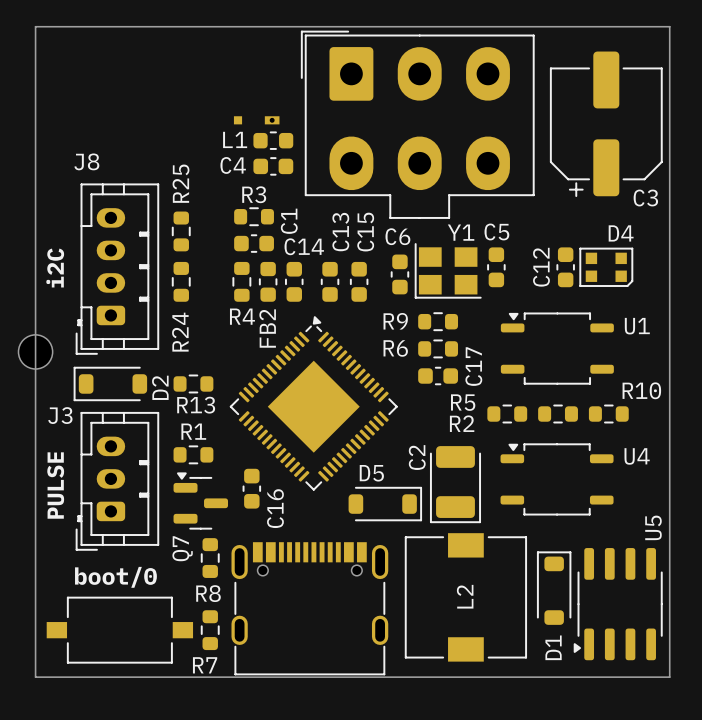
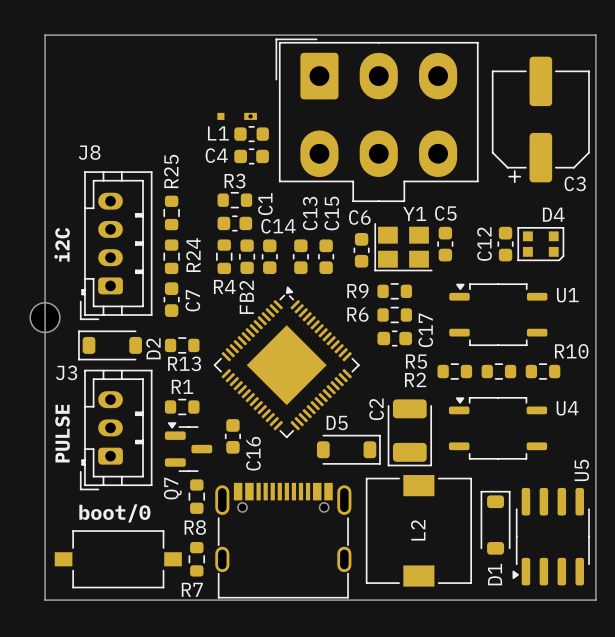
C7: none -> (171, 299)
R24 name position: R24 (180, 332) -> R24 (193, 255)

